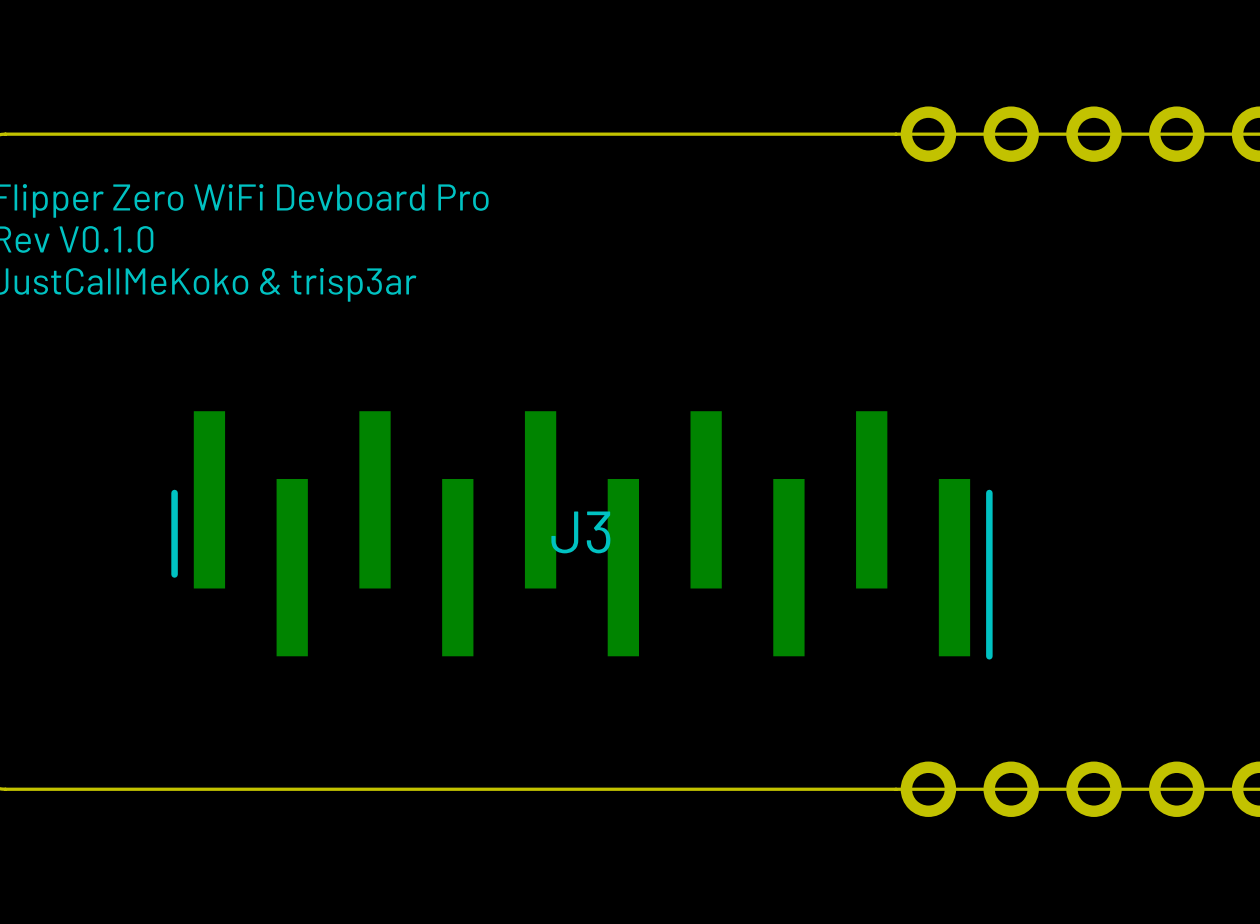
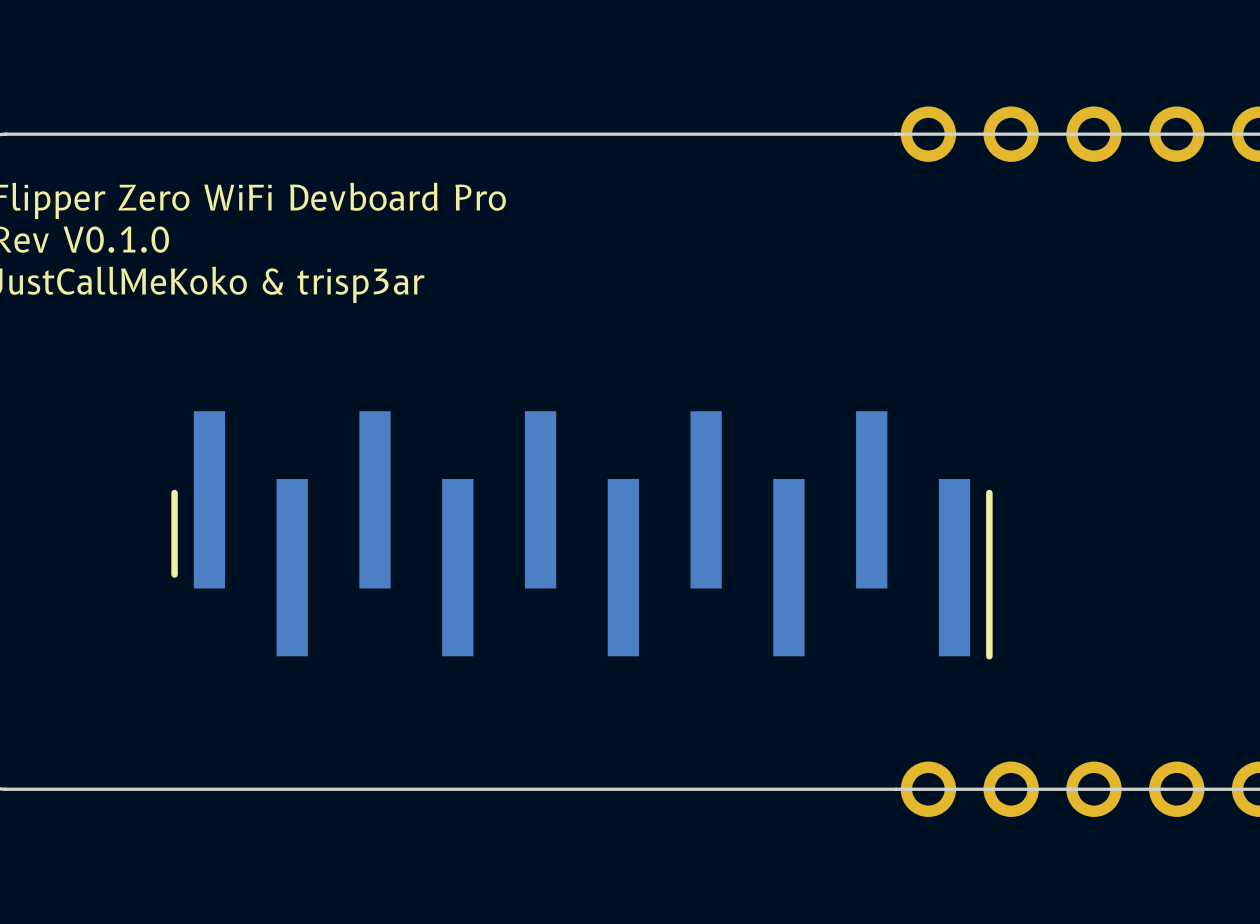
J3 name: J3 (580, 532) -> none

